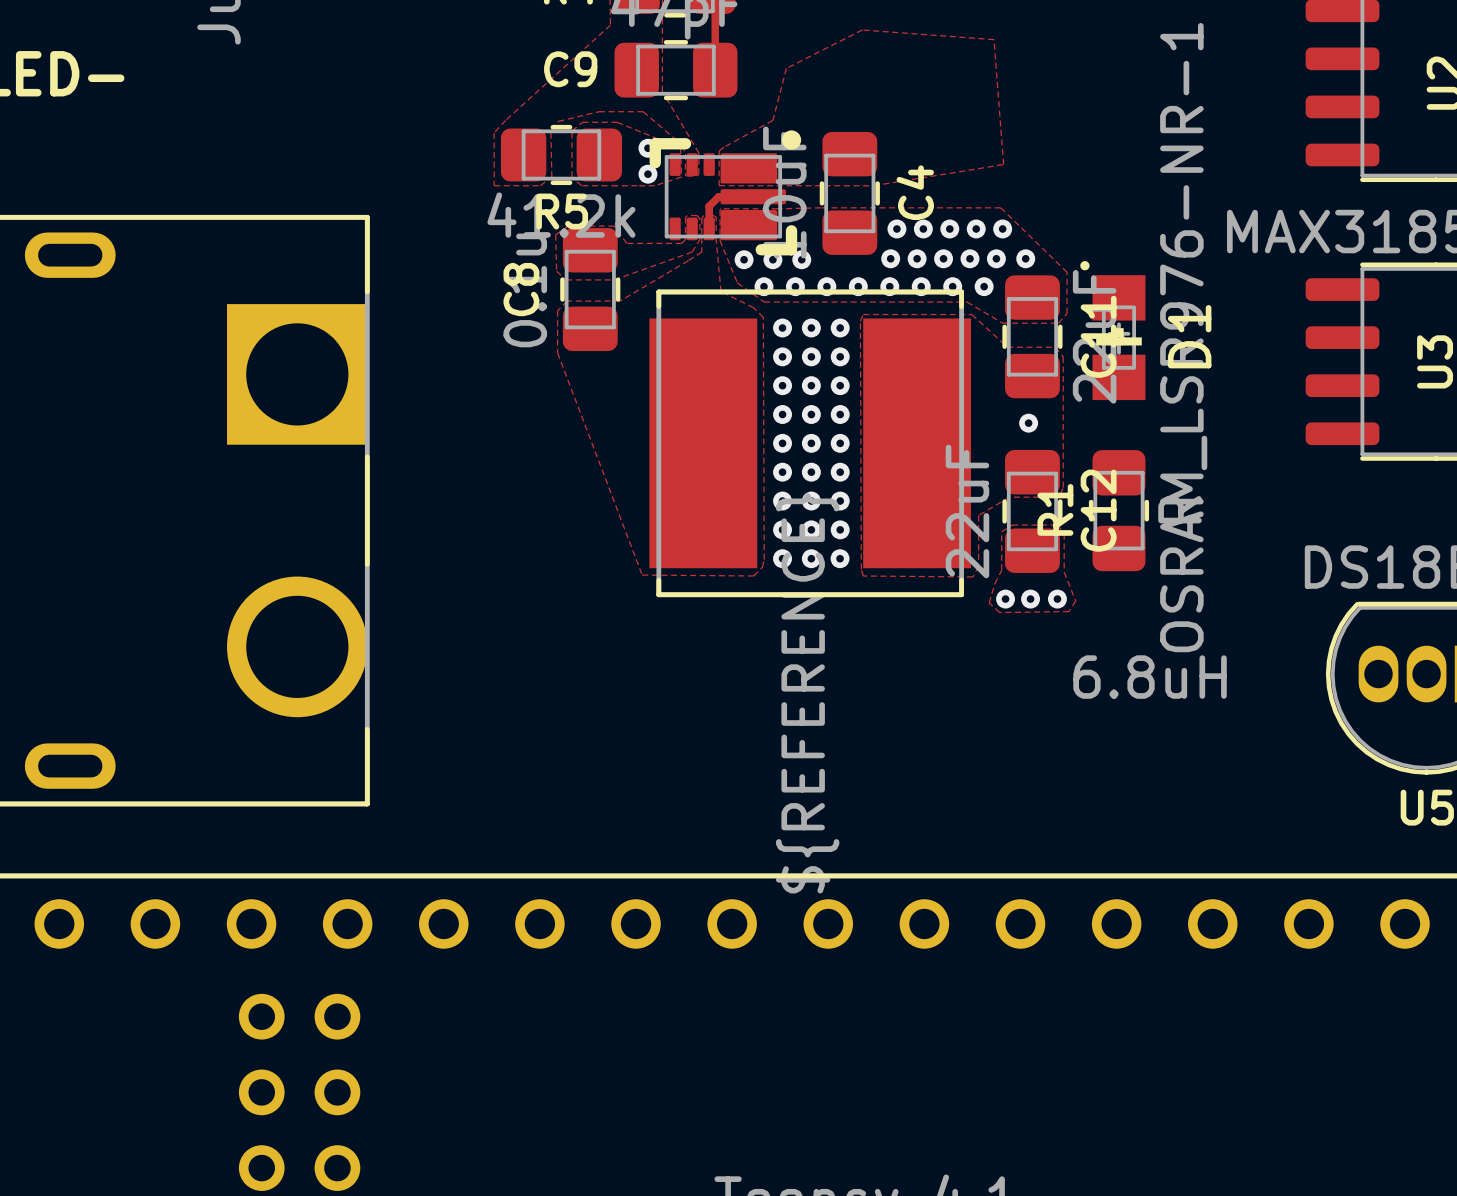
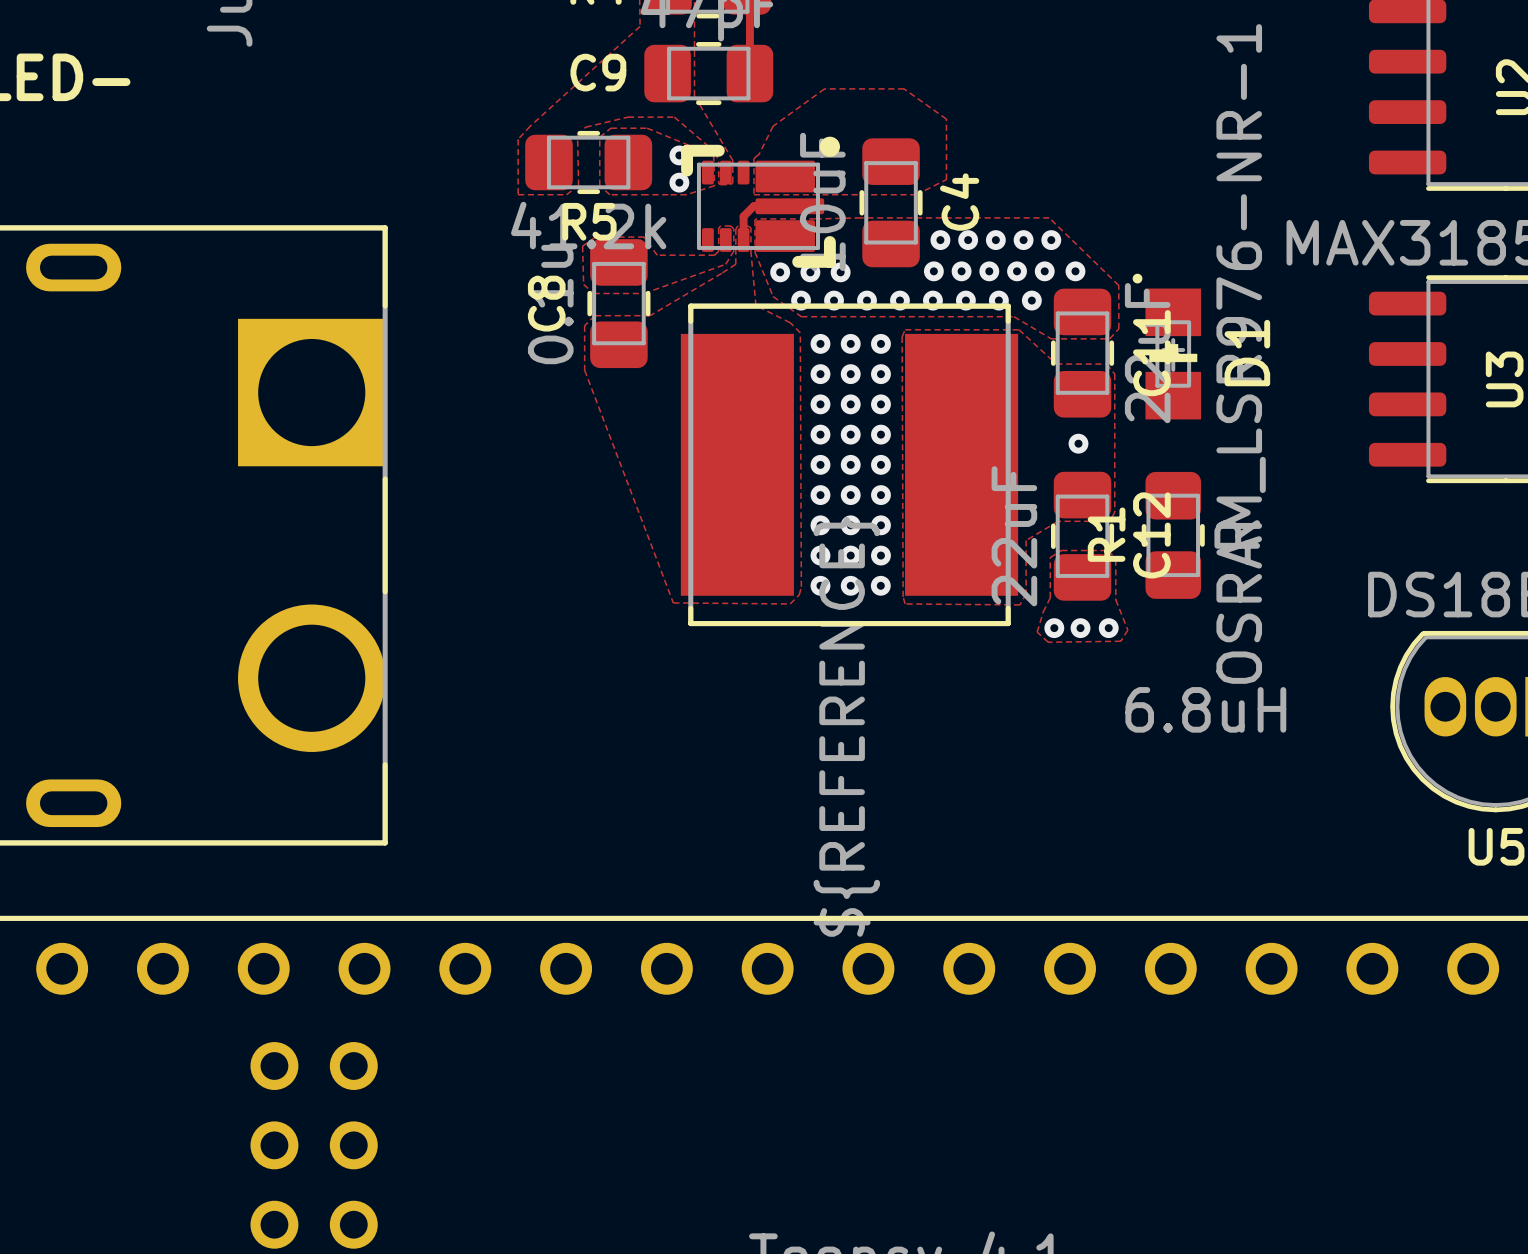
zone outline: (723, 147) (772, 120) (786, 68) (862, 30) (994, 39) (1003, 164) (873, 185) -> (759, 154) (773, 126) (824, 88) (904, 88) (946, 119) (946, 179) (916, 194)

